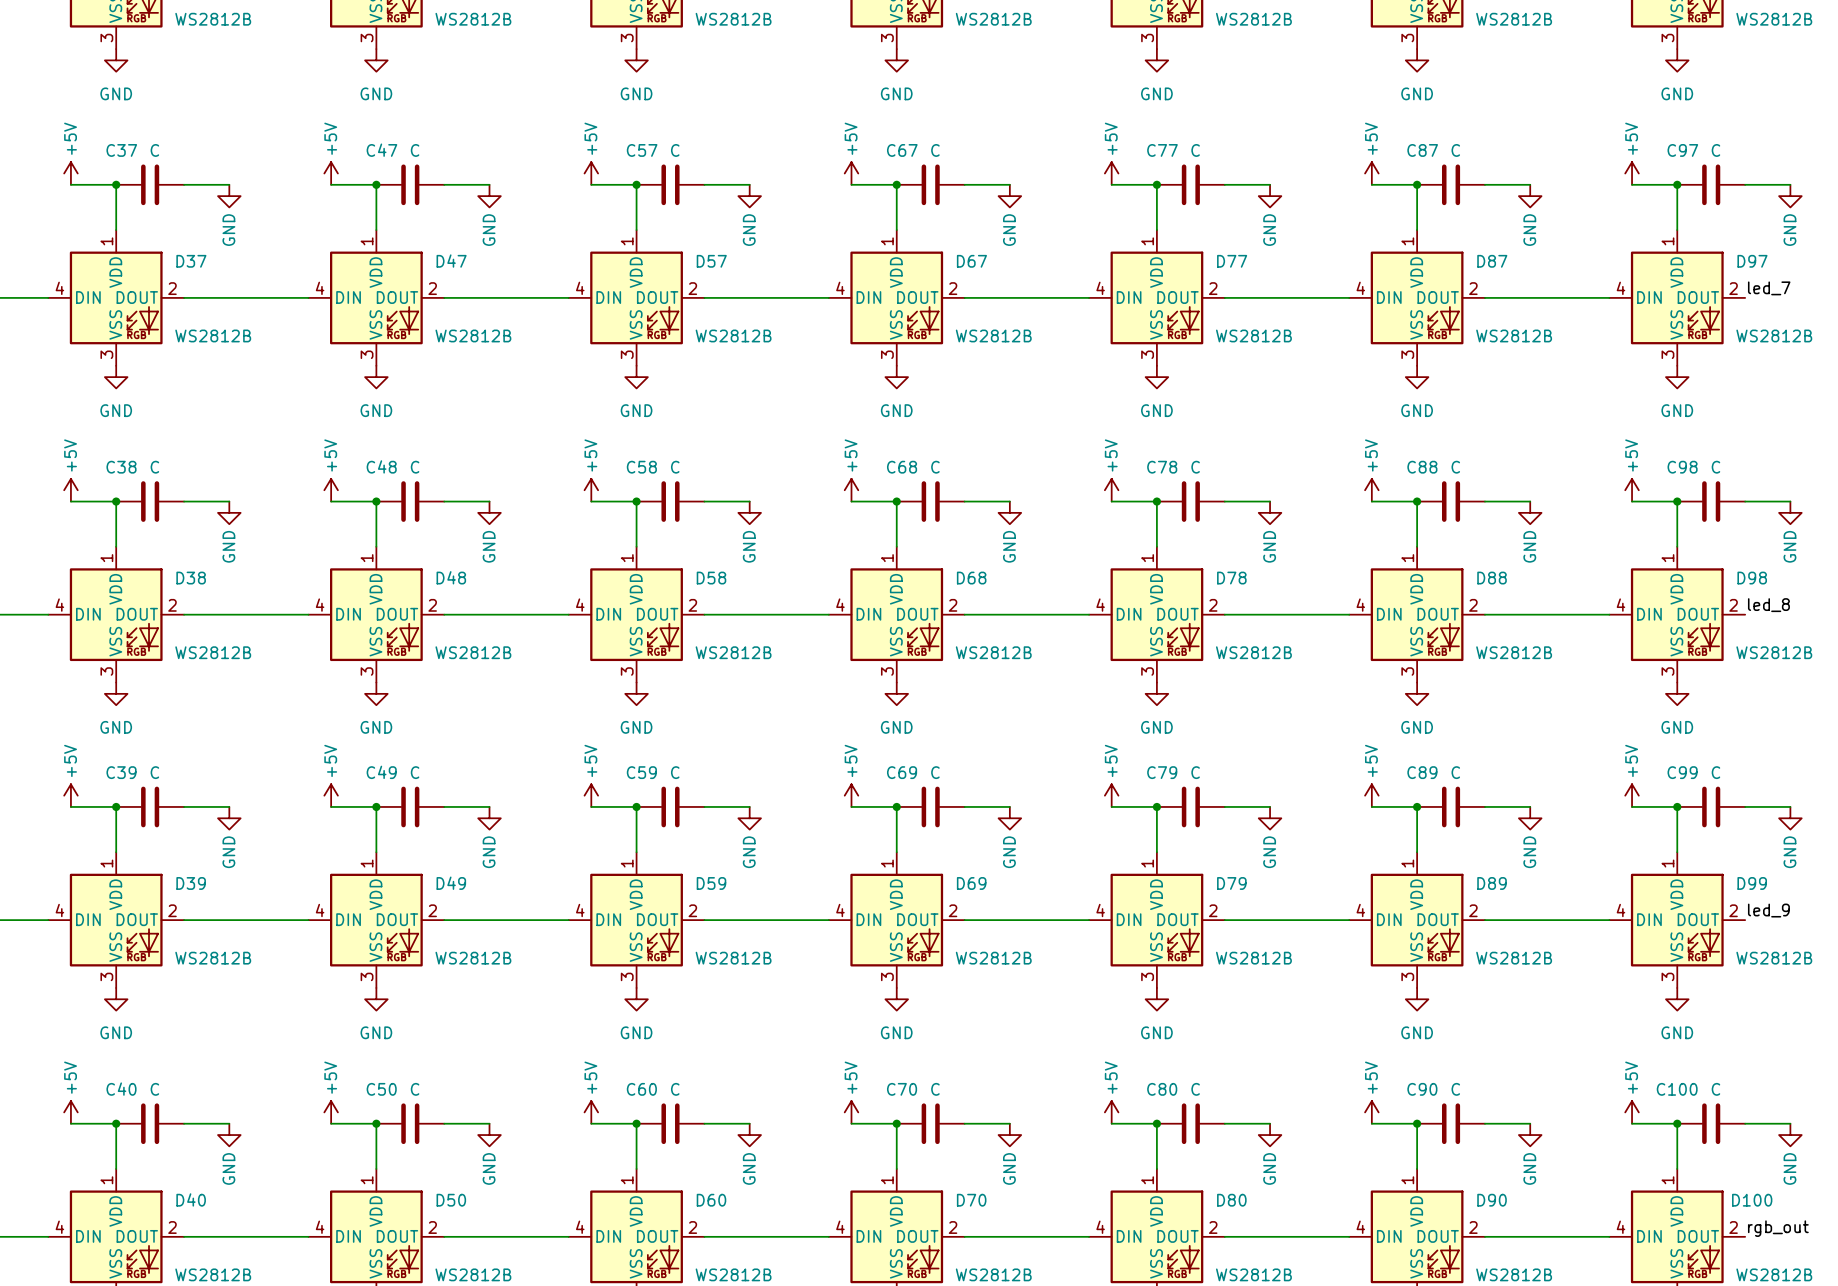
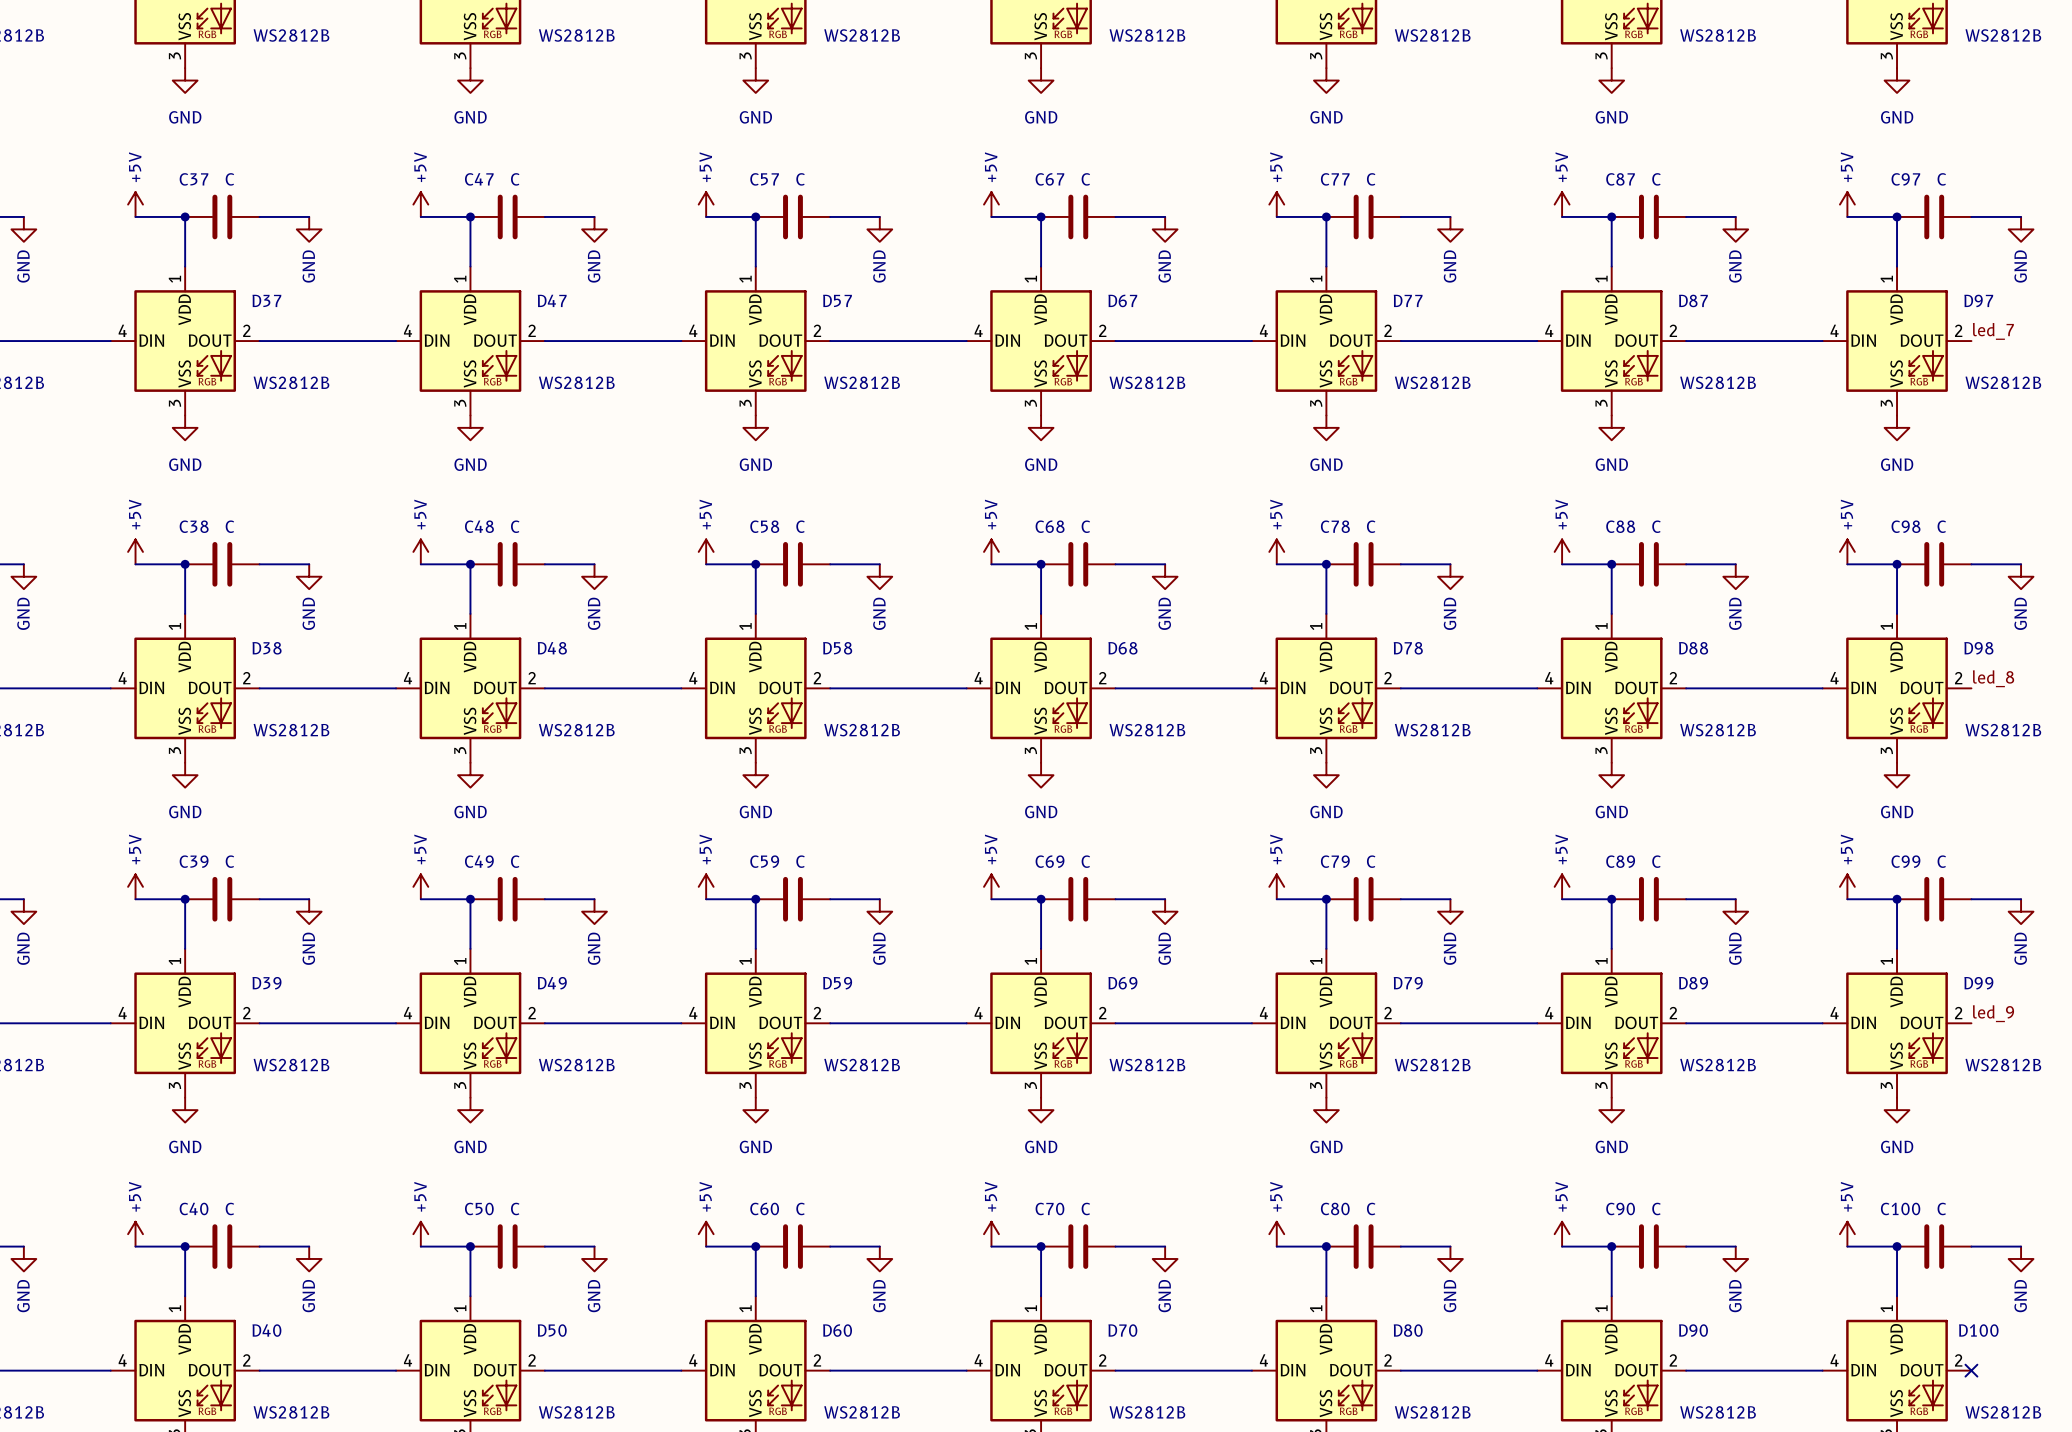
label: rgb_out (1778, 1228) -> none
no-connect mark: none -> (1971, 1370)

